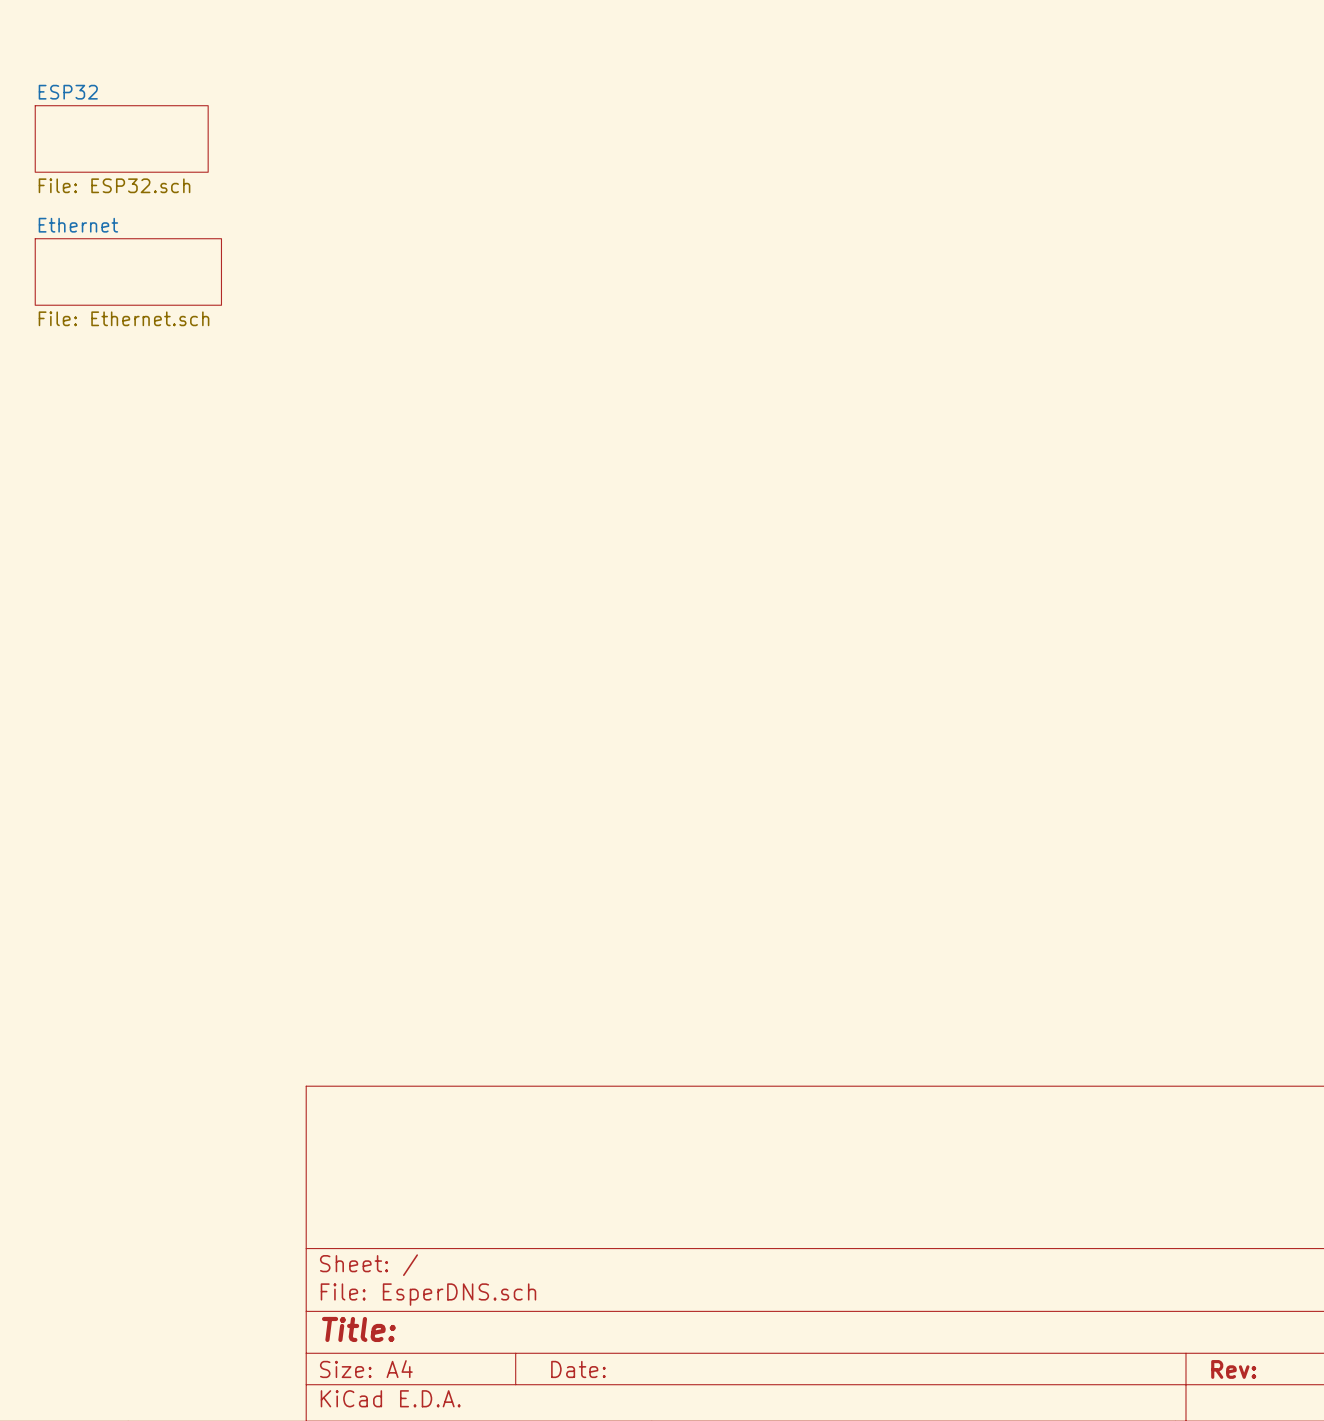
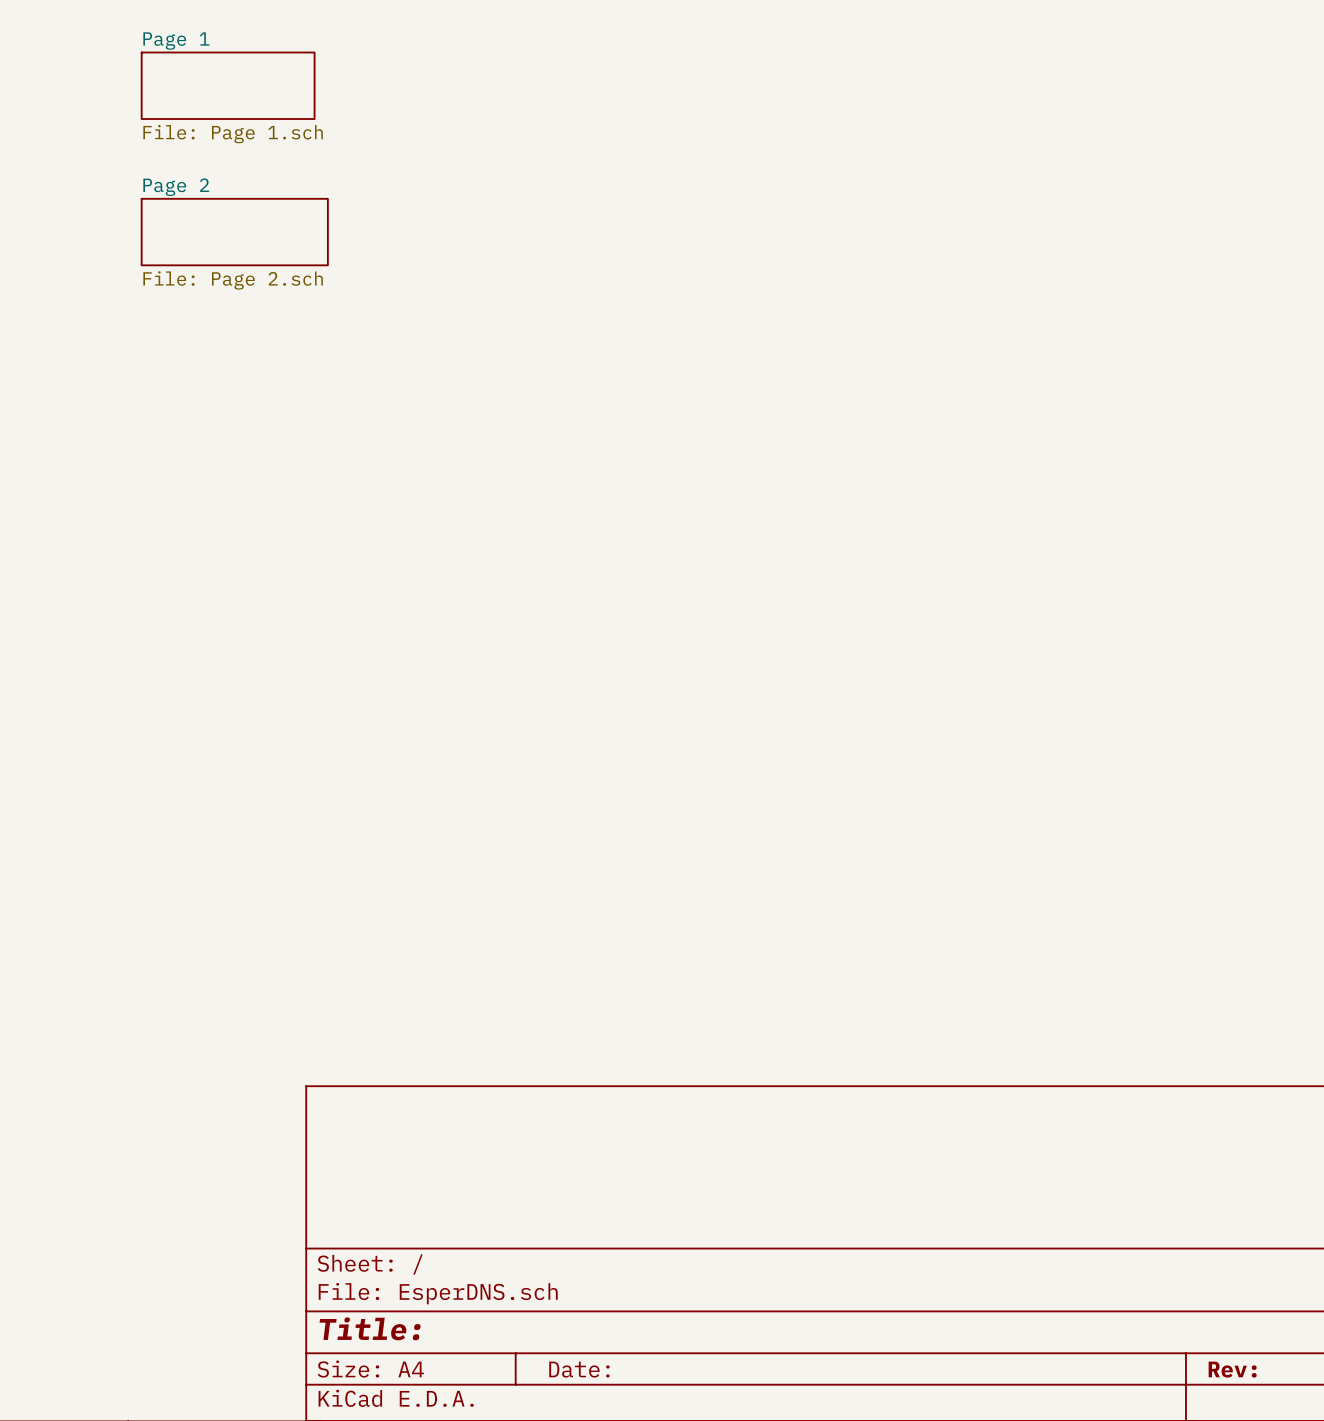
sheet Page 1: none -> File: Page 1.sch (228, 85)
sheet ESP32: File: ESP32.sch (121, 138) -> none
sheet Page 2: none -> File: Page 2.sch (234, 232)
sheet Ethernet: File: Ethernet.sch (128, 271) -> none

